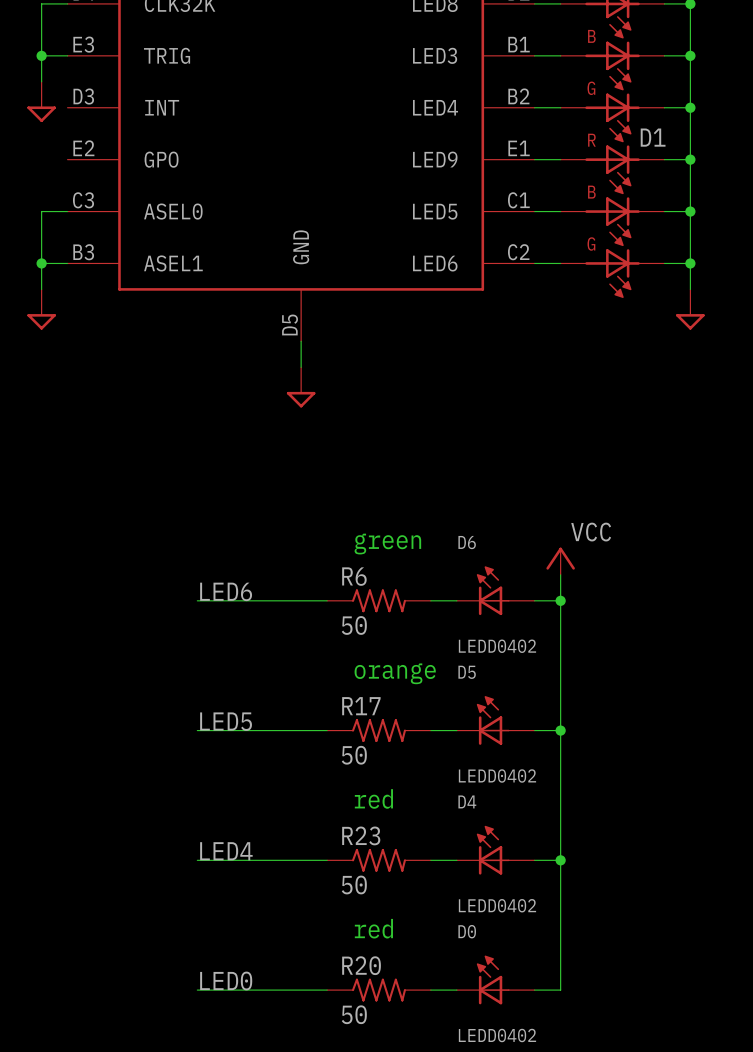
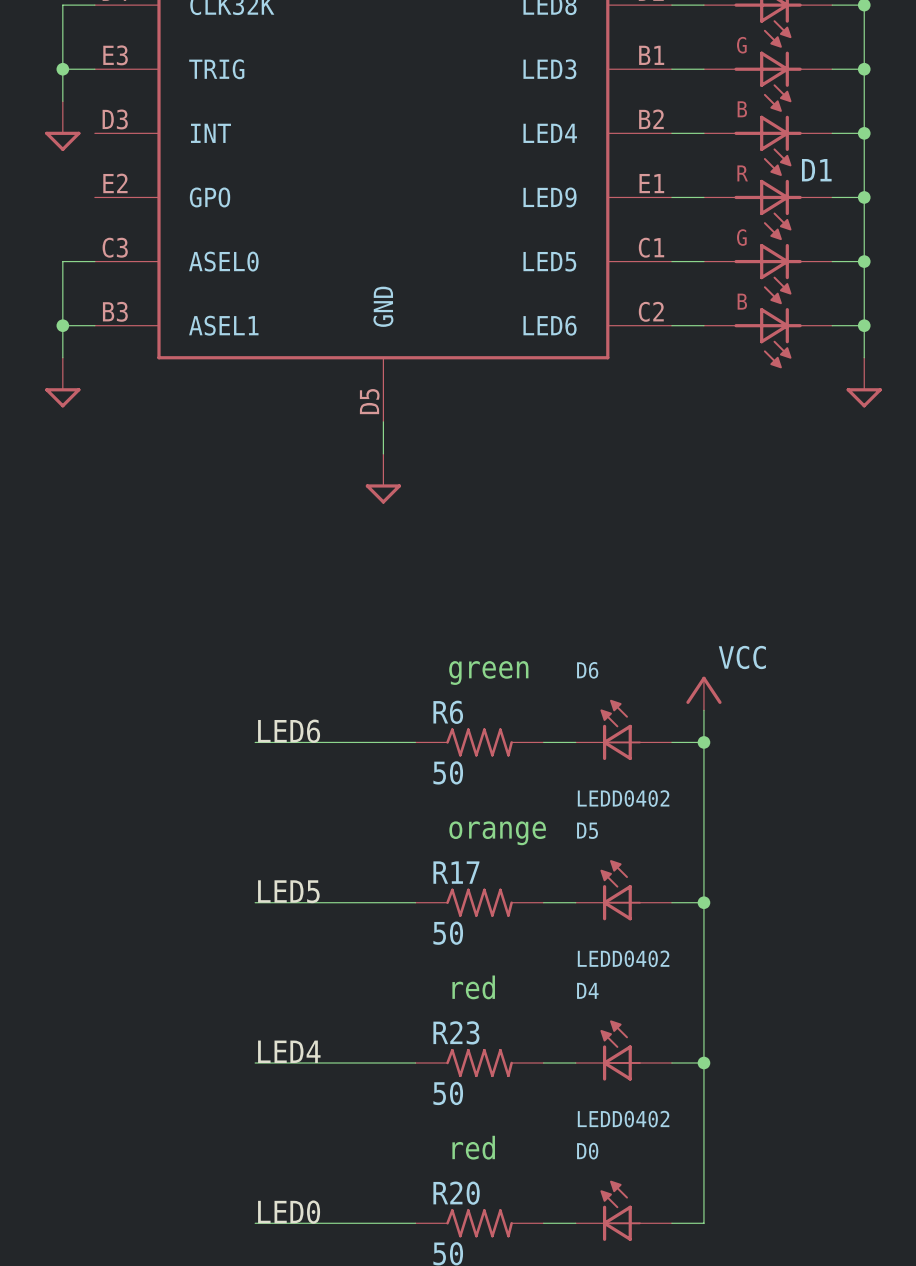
part text: B (591, 36) -> G (741, 45)
part text: G (591, 88) -> B (742, 109)
D1 text: B (591, 192) -> G (741, 237)
D1 text: G (591, 243) -> B (742, 301)

